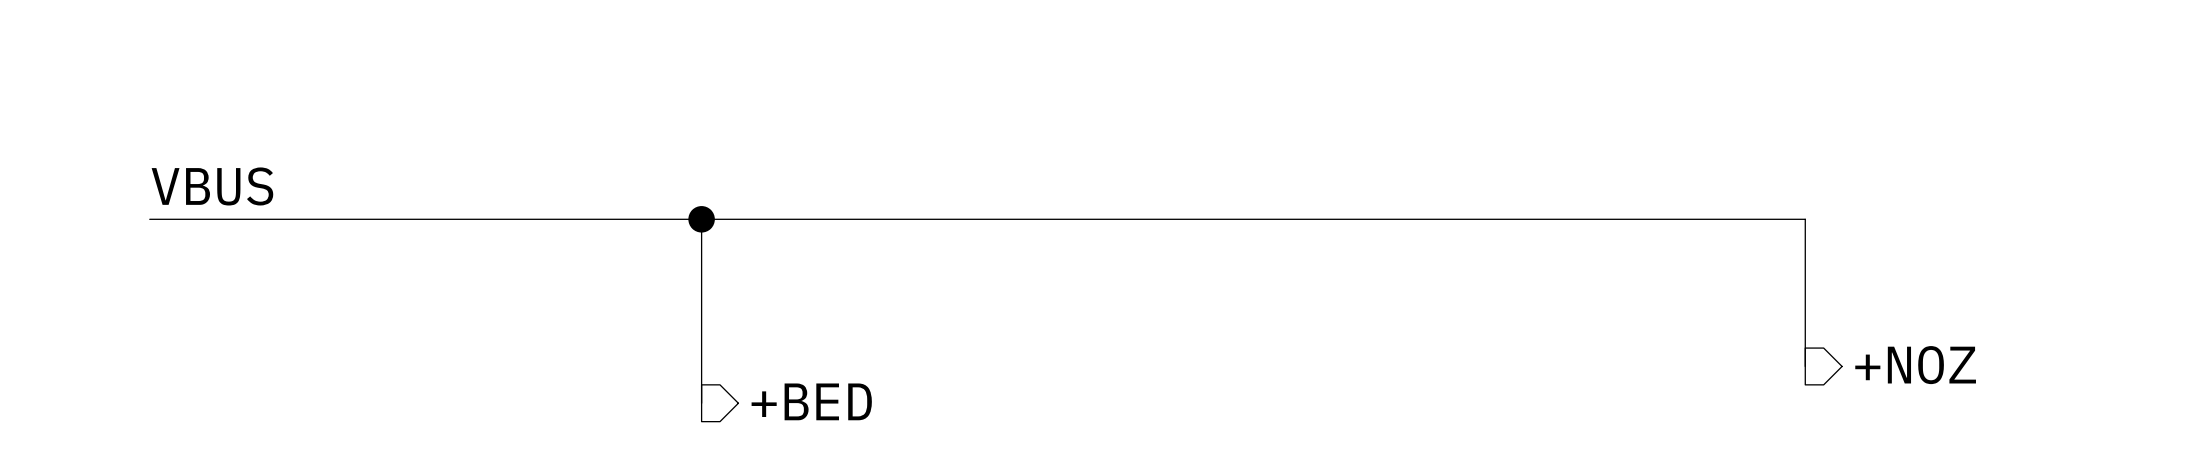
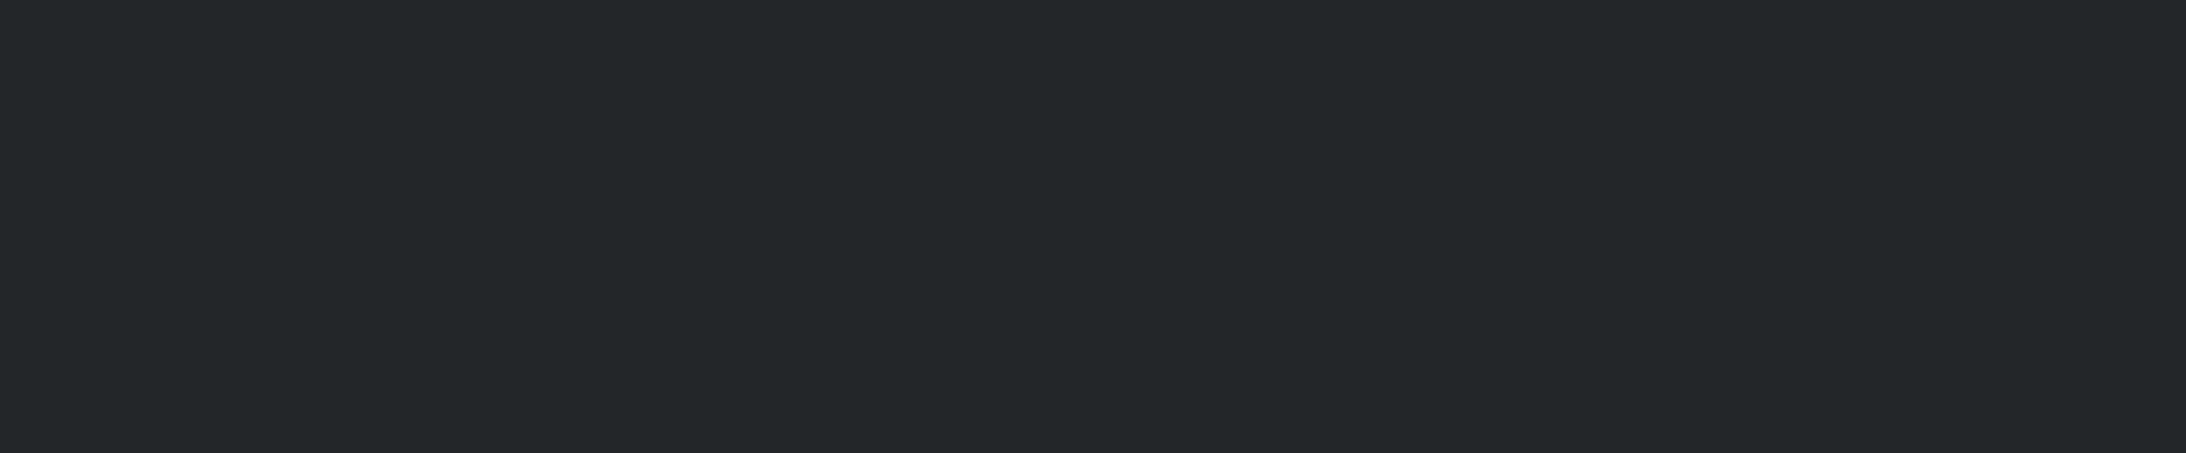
label: VBUS (212, 186) -> none
wire: (149, 219) (1805, 219) (1805, 366) -> none
wire: (701, 219) (701, 403) -> none
junction: (701, 219) -> none
hierarchical label: +NOZ (1915, 365) -> none
hierarchical label: +BED (811, 401) -> none

